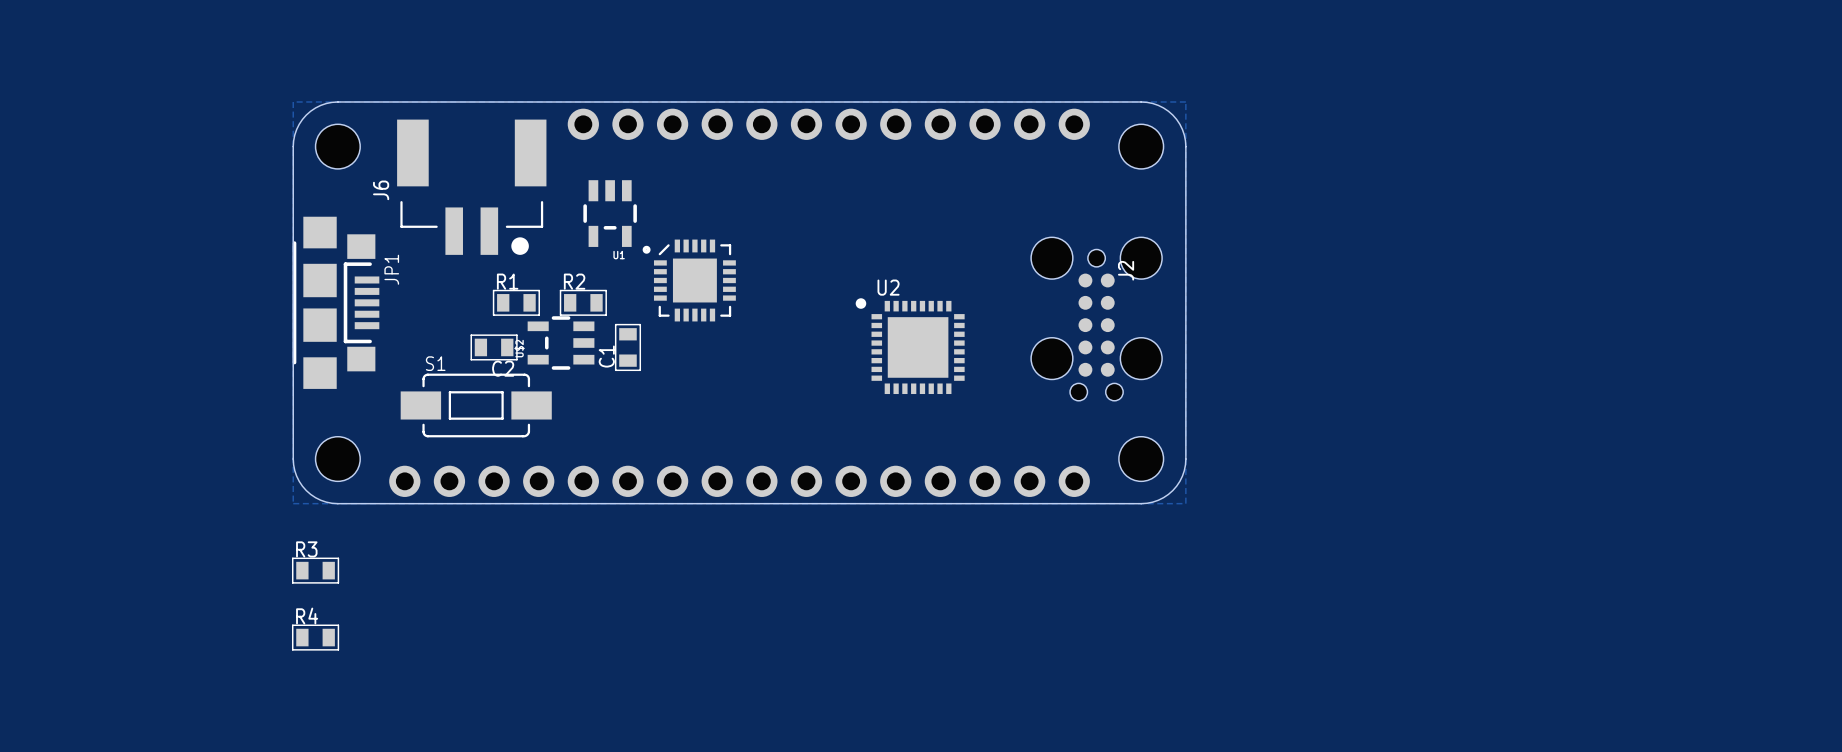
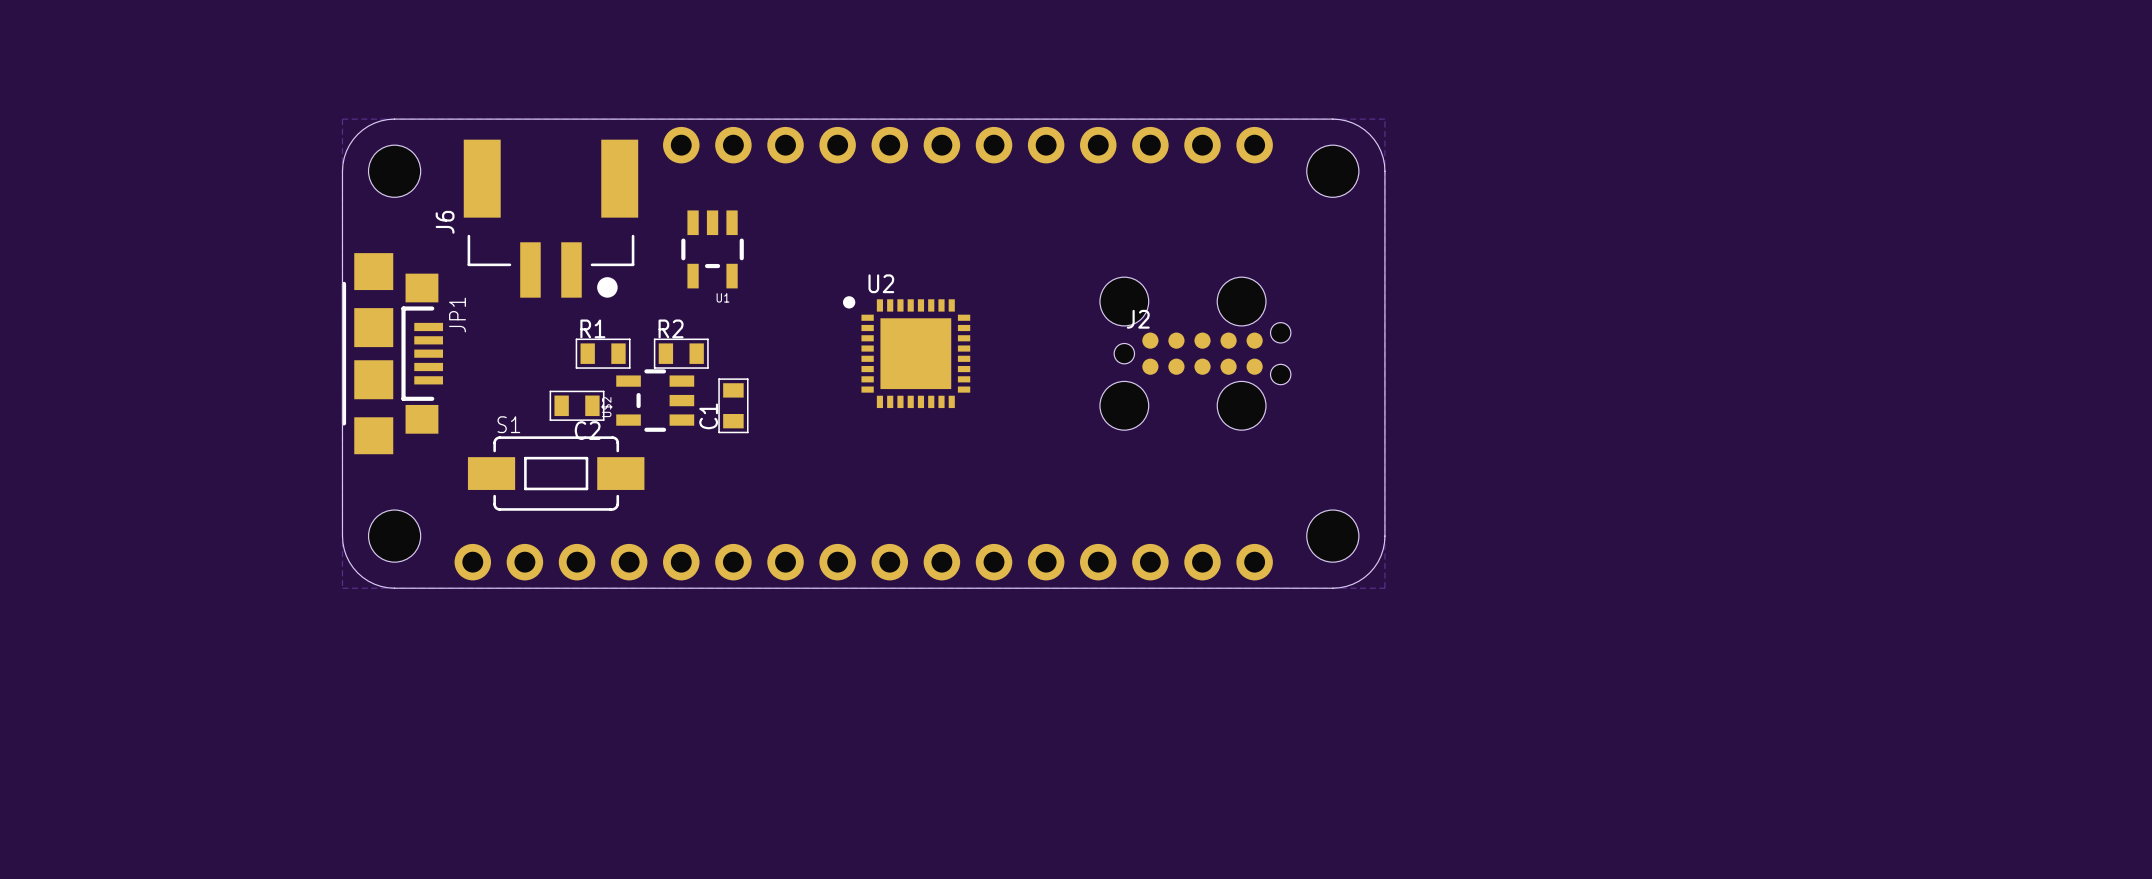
part: (689, 280) -> none
J2 rotation: 0° (1096, 319) -> 90° counterclockwise (1195, 353)
U2 position: (910, 346) -> (906, 352)
R3: (315, 570) -> none
R4: (315, 637) -> none

